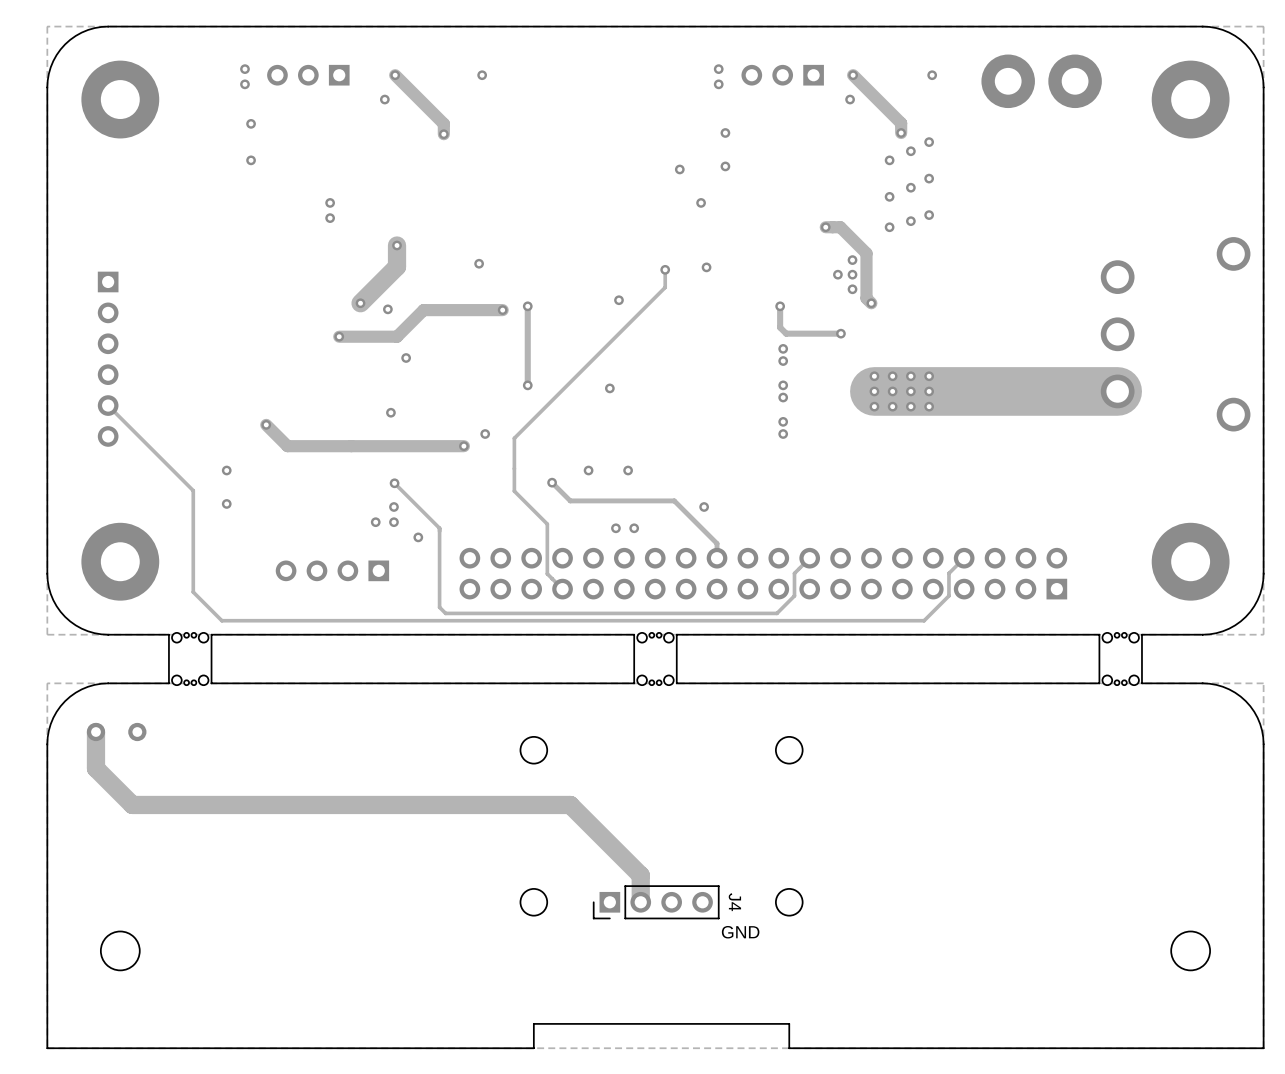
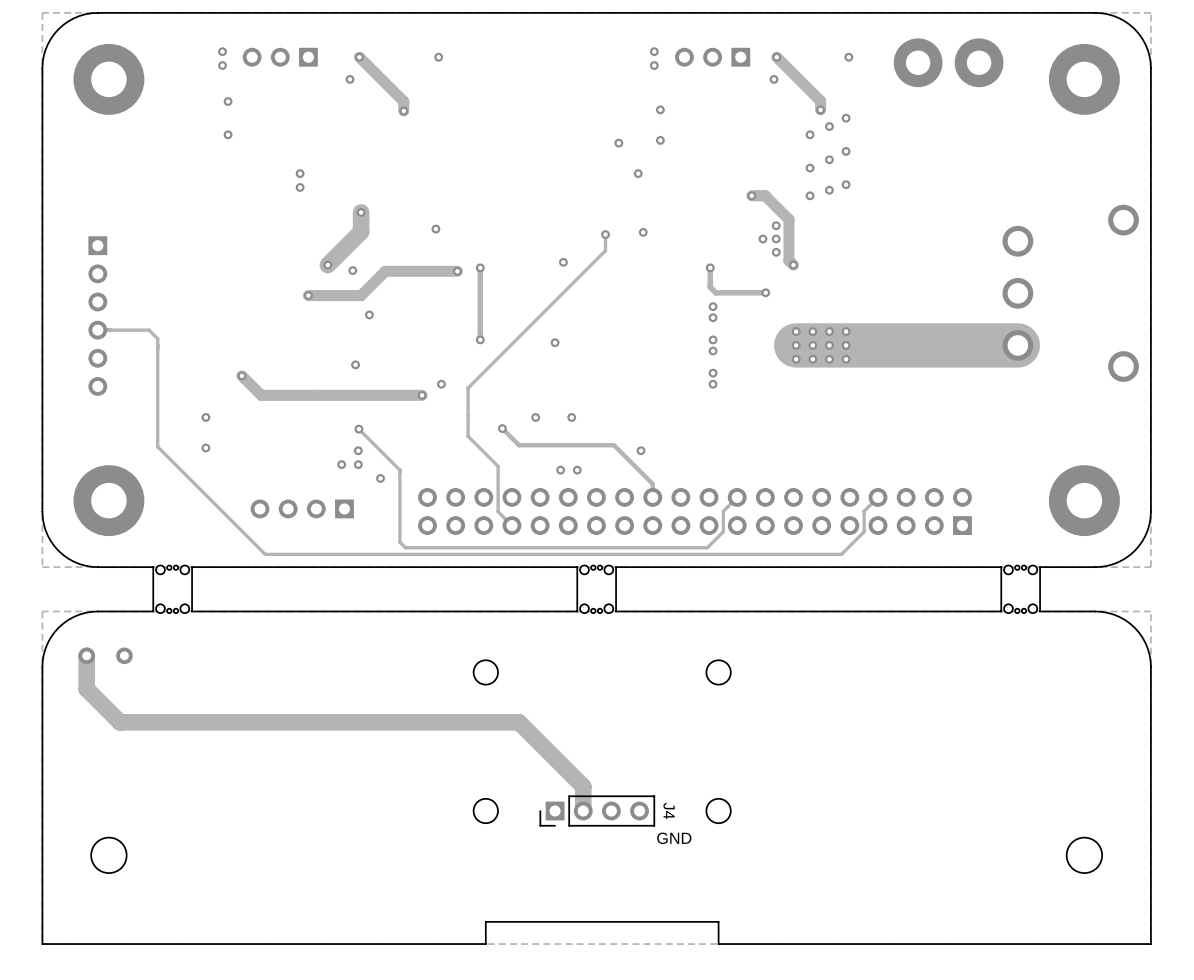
track: (108, 405) (193, 490) (193, 592) (221, 620) (291, 620) -> (97, 330) (149, 330) (157, 338) (157, 446) (265, 554)

